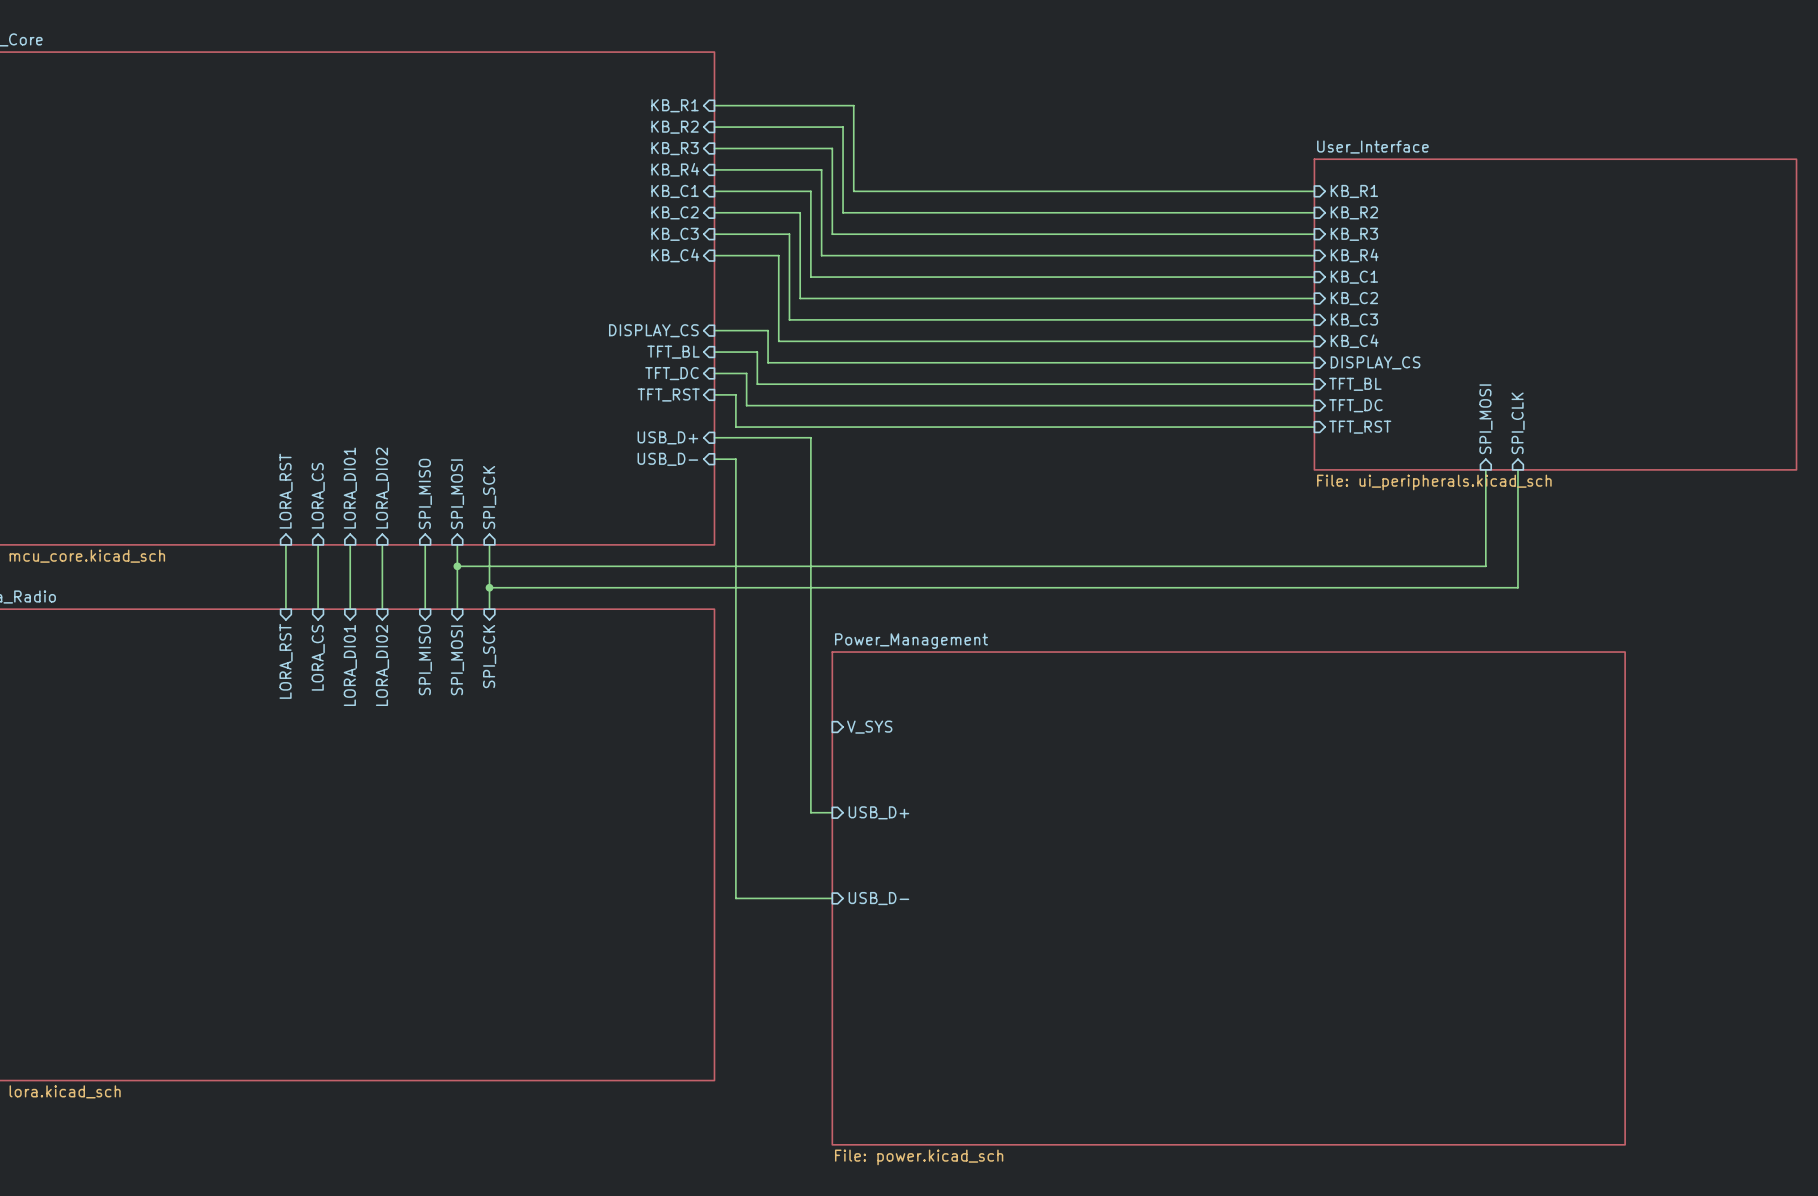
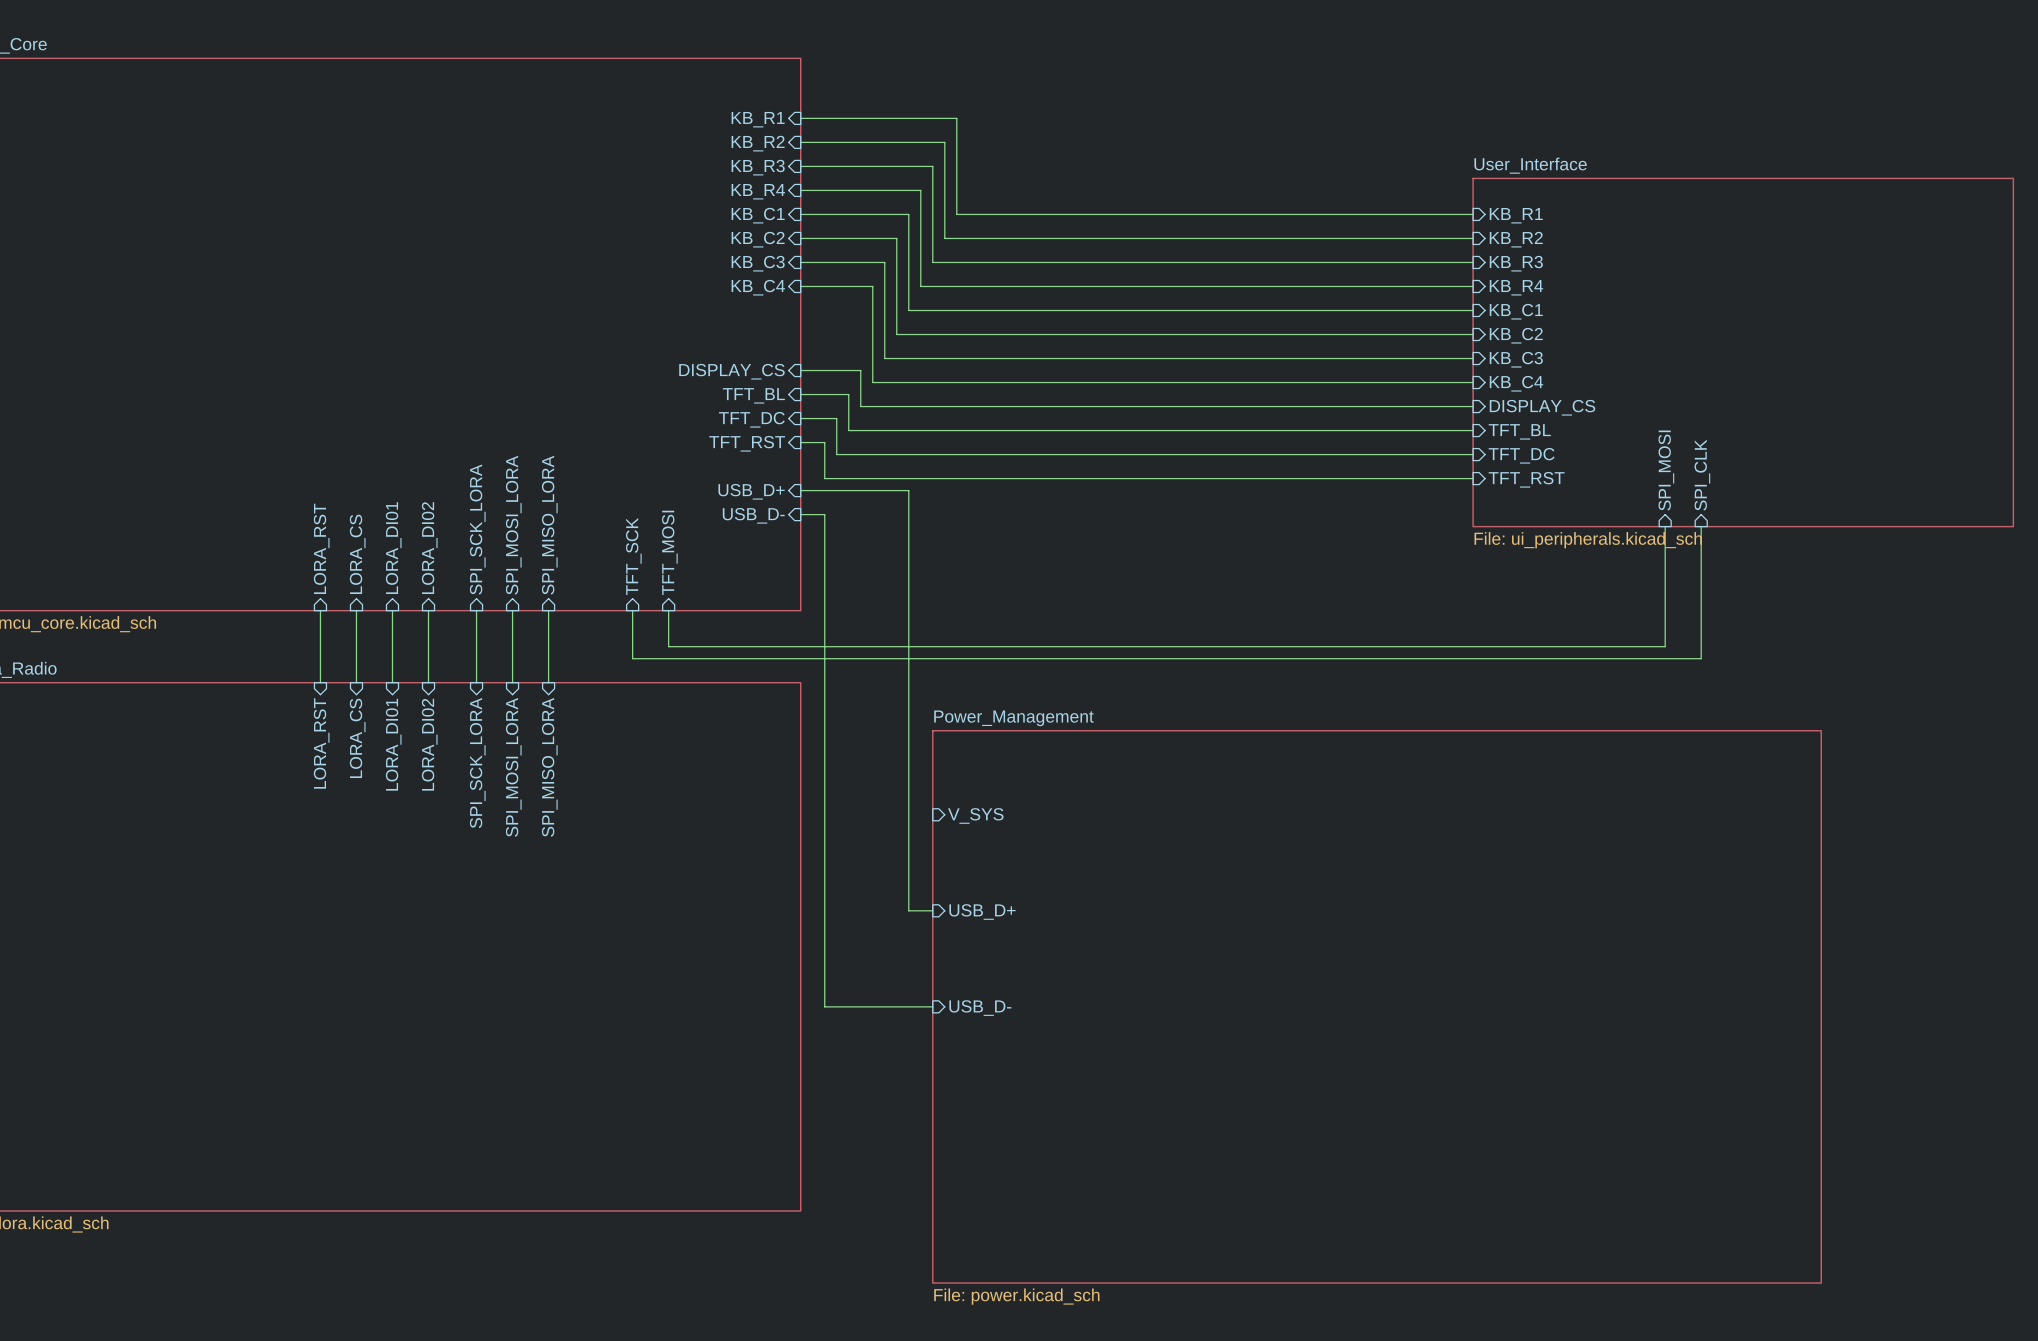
sheet pin: SPI_MISO (425, 493) -> SPI_SCK_LORA (477, 529)
sheet pin: SPI_MOSI (457, 494) -> SPI_MOSI_LORA (513, 525)
sheet pin: none -> TFT_MOSI (669, 552)
sheet pin: SPI_SCK (489, 497) -> SPI_MISO_LORA (549, 525)
sheet pin: none -> TFT_SCK (633, 556)
wire: (457, 566) (1485, 566) -> (668, 610) (668, 646) (1665, 646) (1665, 634)
junction: (457, 566) -> none
wire: (489, 587) (564, 587) -> (632, 610) (632, 658)
junction: (489, 587) -> none
sheet pin: SPI_SCK (489, 656) -> SPI_MISO_LORA (549, 767)
sheet pin: SPI_MISO (425, 660) -> SPI_SCK_LORA (477, 763)
sheet pin: SPI_MOSI (457, 660) -> SPI_MOSI_LORA (513, 767)

